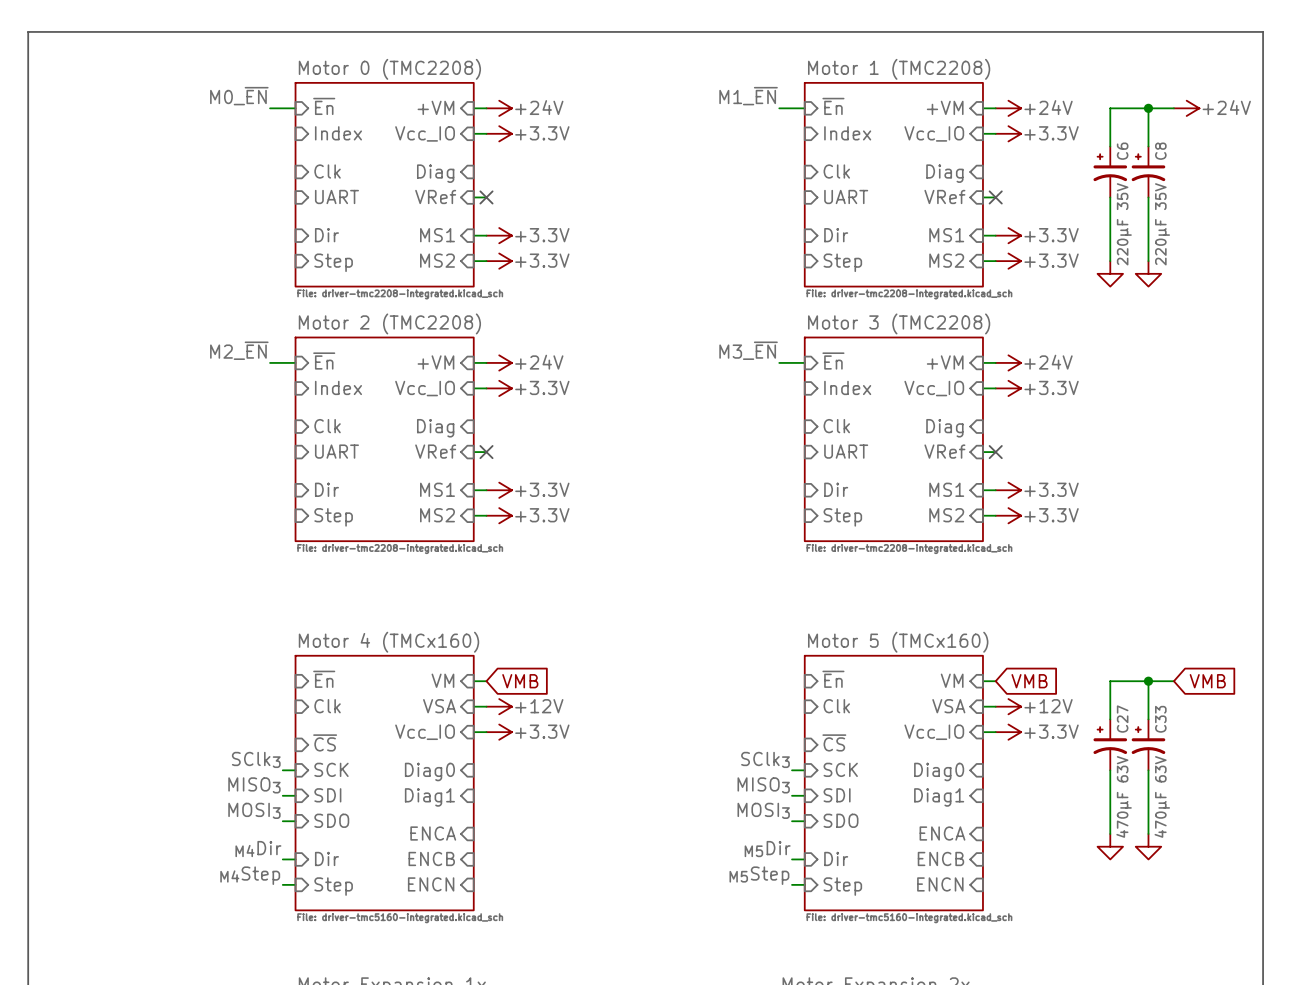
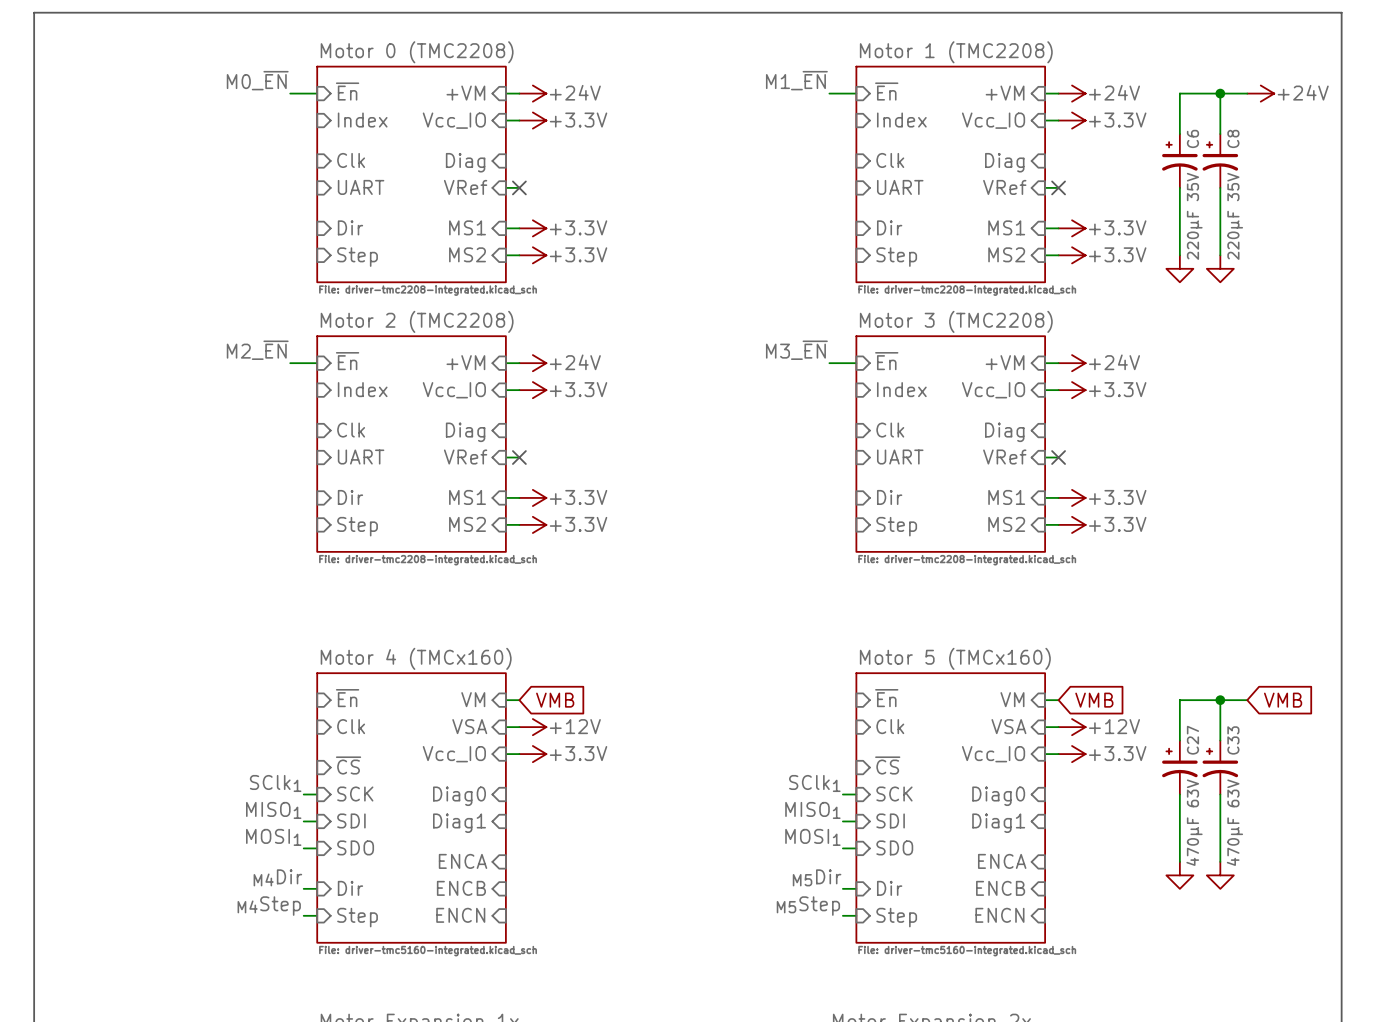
label: SClk3 (256, 759) -> SClk1 (275, 783)
label: SClk3 (765, 759) -> SClk1 (814, 783)
label: MISO3 (254, 785) -> MISO1 (273, 810)
label: MISO3 (763, 785) -> MISO1 (812, 810)
label: MOSI3 (254, 810) -> MOSI1 (273, 837)
label: MOSI3 (763, 810) -> MOSI1 (812, 837)

